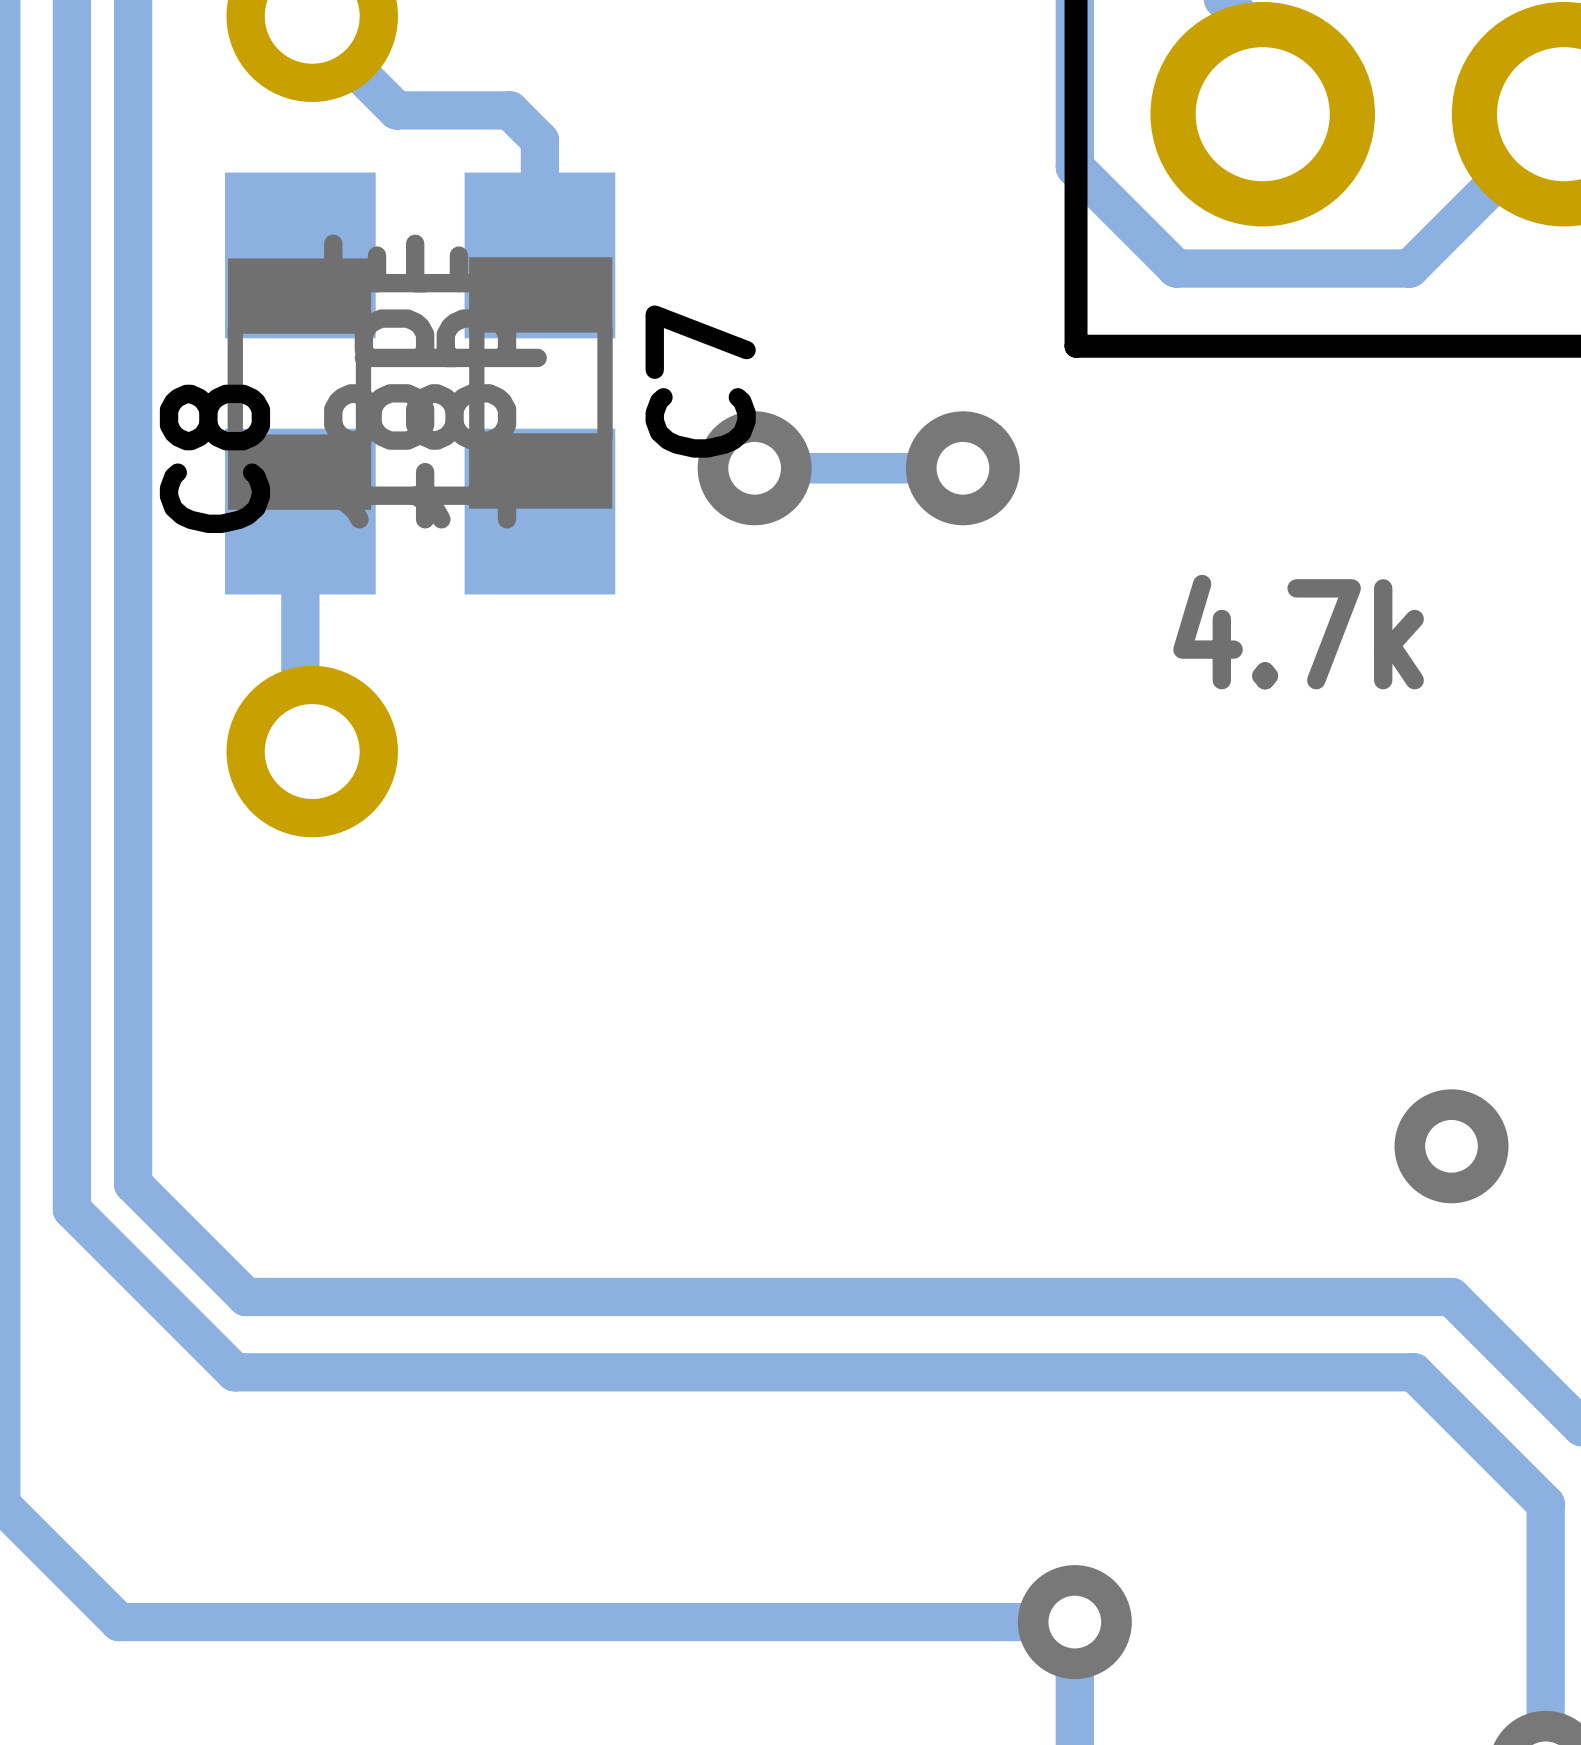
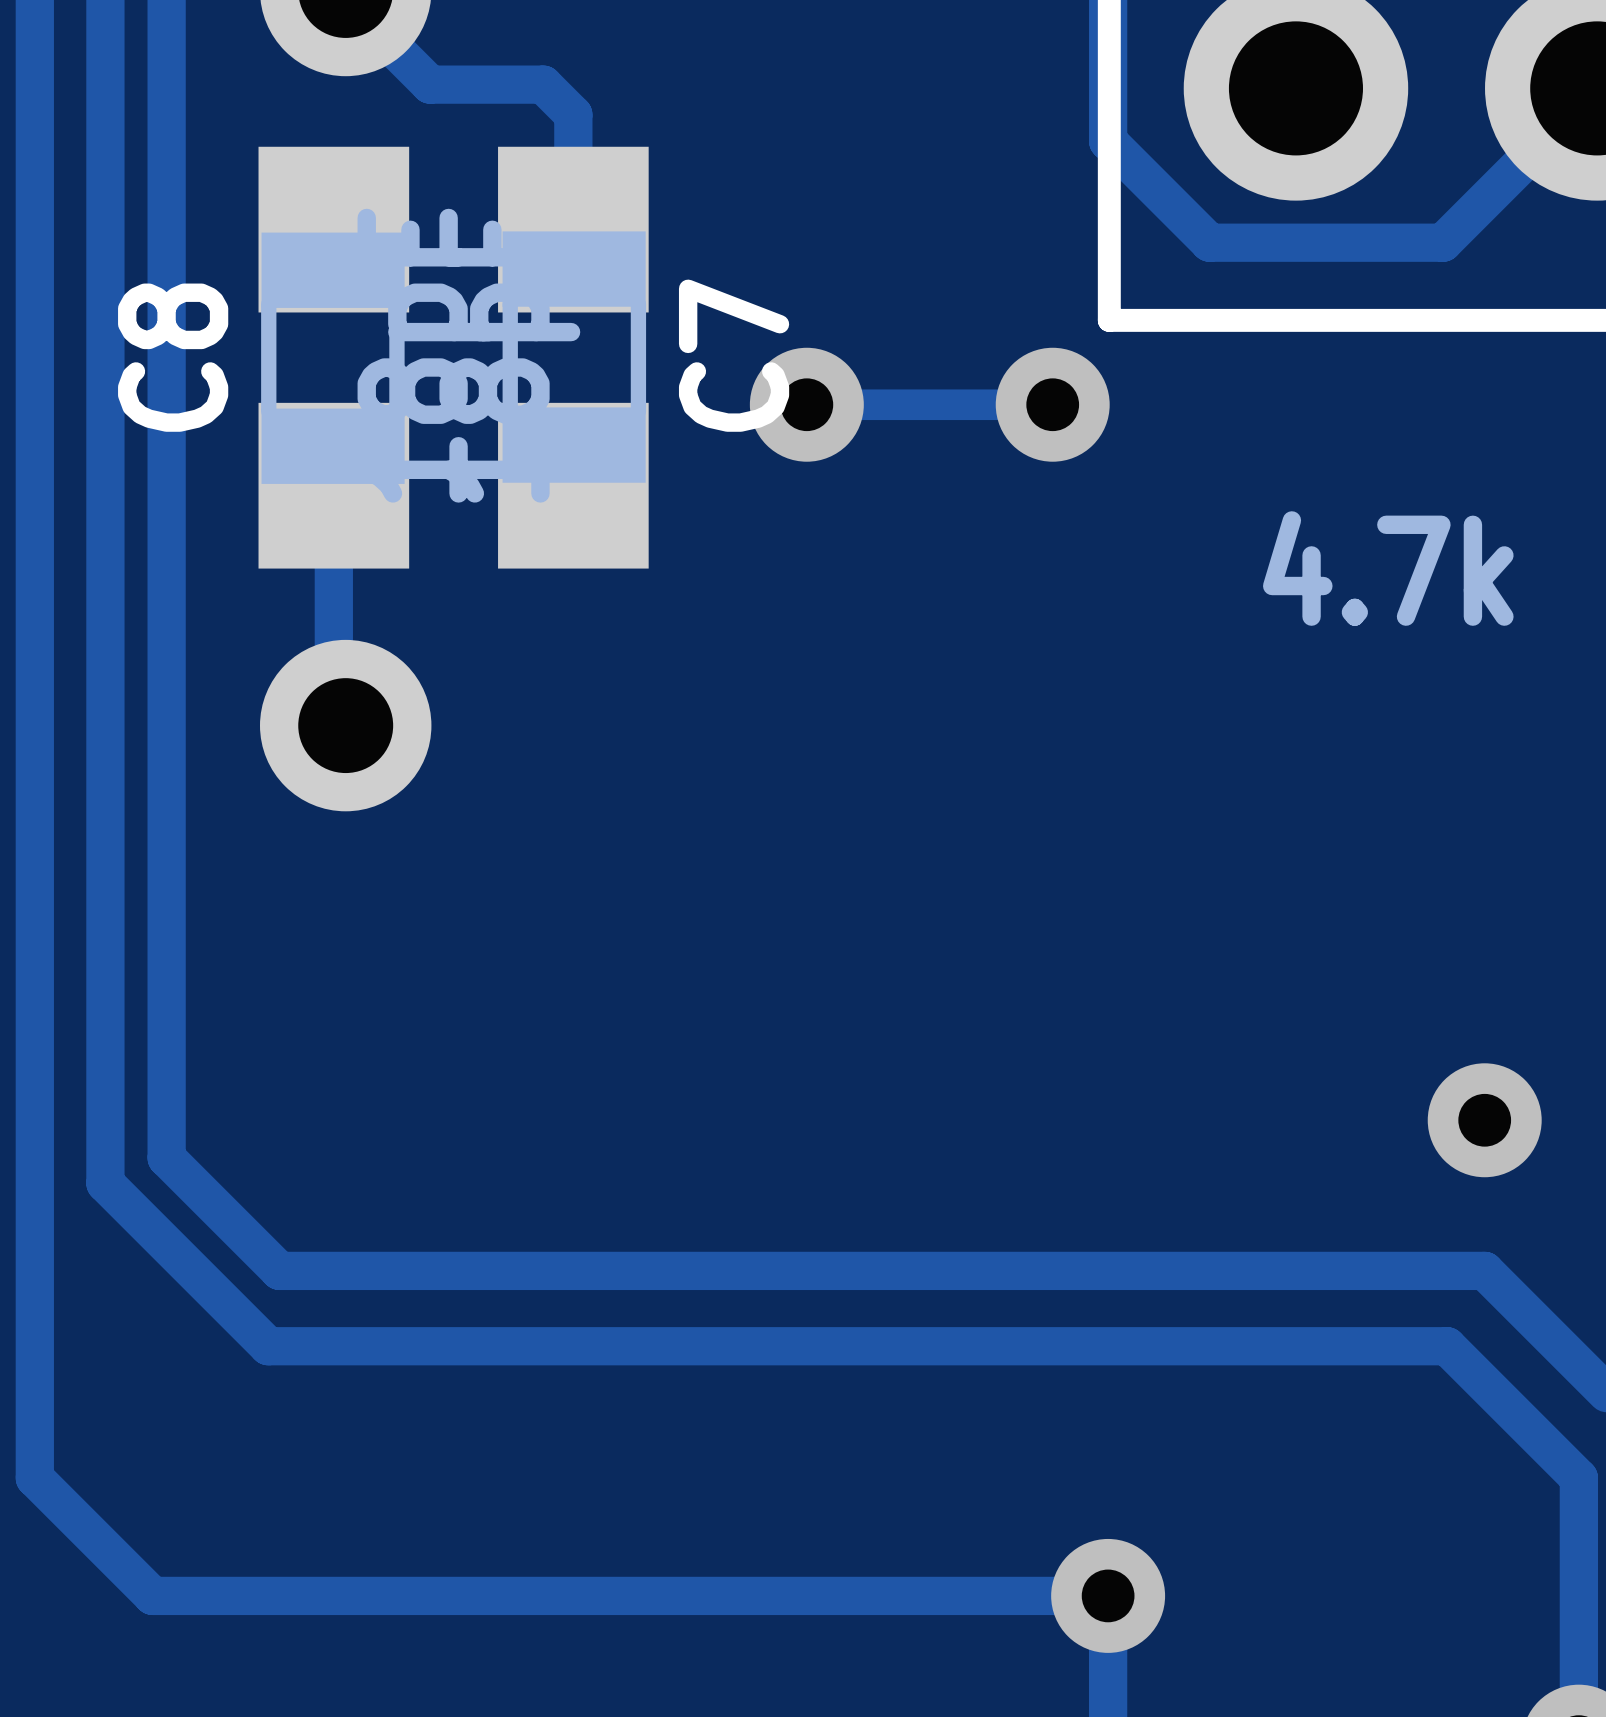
track: none -> (1052, 404) (806, 404)
C8 name position: C8 (214, 458) -> C8 (173, 357)
via position: (754, 468) -> (806, 404)
track: (962, 468) (754, 468) -> none
via position: (962, 468) -> (1052, 404)
part position: (1298, 632) -> (1388, 568)

